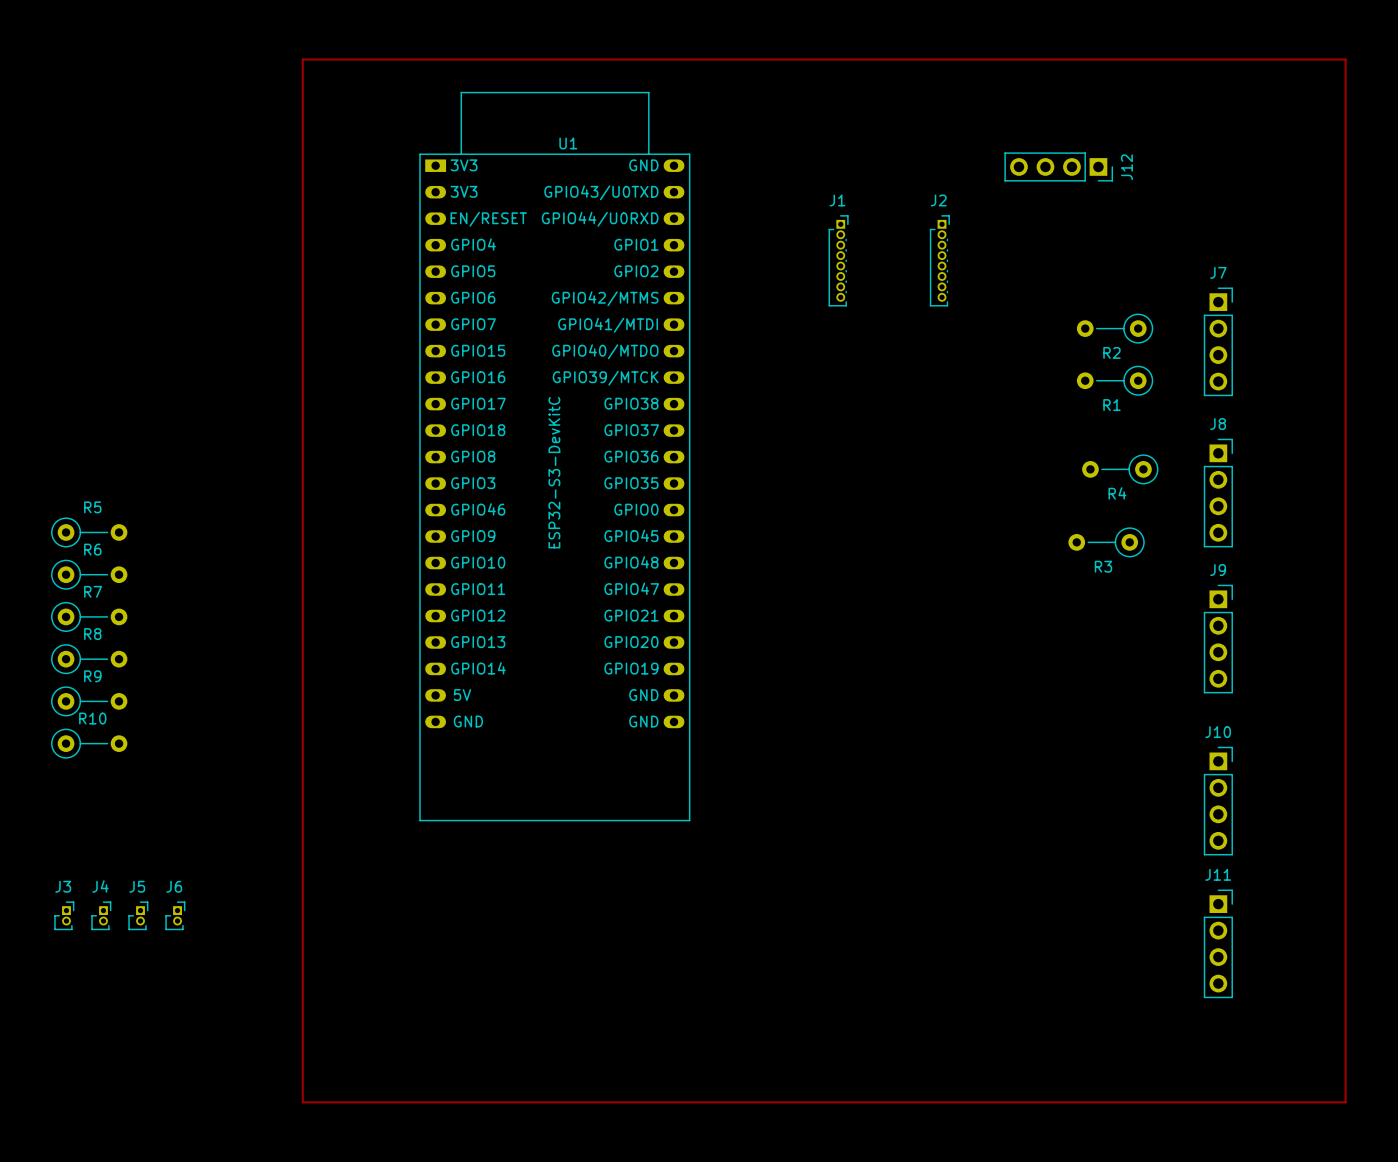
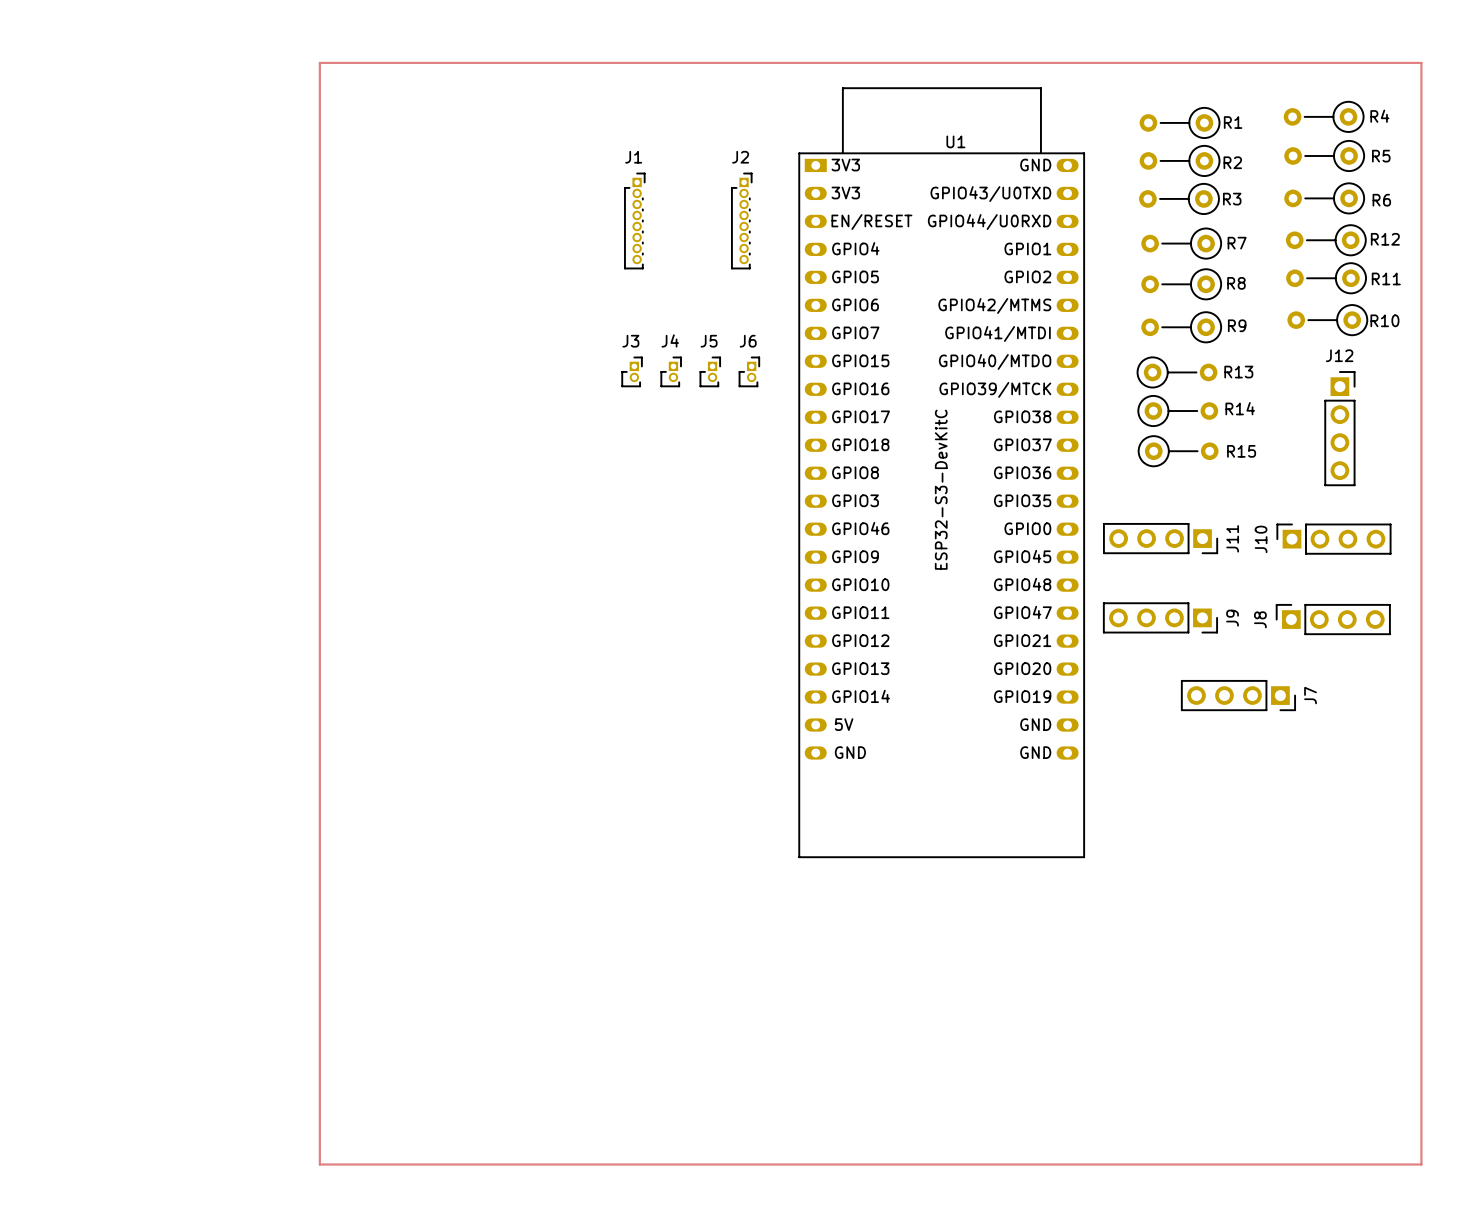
J12 rotation: 0° (1058, 166) -> 90° counterclockwise (1339, 428)
J12 position: (1058, 166) -> (1339, 428)
R12: none -> (1326, 240)
J1 position: (838, 260) -> (634, 220)
J2 position: (939, 260) -> (741, 220)
R11: none -> (1326, 278)
R2 position: (1115, 328) -> (1179, 160)
J7 rotation: 0° (1218, 341) -> 90° clockwise (1238, 695)
J7 position: (1218, 341) -> (1238, 695)
R2 name position: R2 (1111, 352) -> R2 (1232, 162)
R13: none -> (1177, 372)
R1 position: (1115, 380) -> (1179, 198)
R14: none -> (1177, 411)
R1 name position: R1 (1111, 405) -> R1 (1233, 122)
R15: none -> (1178, 451)
U1 position: (554, 456) -> (941, 472)
R4 position: (1120, 469) -> (1323, 116)
R4 name position: R4 (1117, 493) -> R4 (1379, 116)
J8 rotation: 0° (1218, 493) -> 90° counterclockwise (1333, 619)
J8 position: (1218, 493) -> (1333, 619)
R5 name position: R5 (92, 507) -> R5 (1381, 156)
R5 rotation: 0° (89, 532) -> 180° (1324, 155)
R5 position: (89, 532) -> (1324, 155)
R3 position: (1106, 542) -> (1179, 122)
R6 name position: R6 (92, 549) -> R6 (1381, 200)
R3 name position: R3 (1103, 566) -> R3 (1232, 199)
R6 rotation: 0° (89, 574) -> 180° (1324, 198)
R6 position: (89, 574) -> (1324, 198)
R7 name position: R7 (93, 591) -> R7 (1237, 243)
R7 rotation: 0° (89, 616) -> 180° (1181, 243)
R7 position: (89, 616) -> (1181, 243)
R8 name position: R8 (92, 634) -> R8 (1236, 283)
J9 rotation: 0° (1218, 639) -> 90° clockwise (1160, 617)
J9 position: (1218, 639) -> (1160, 617)
R8 rotation: 0° (89, 659) -> 180° (1181, 284)
R8 position: (89, 659) -> (1181, 284)
R9 name position: R9 (92, 676) -> R9 (1237, 325)
R9 rotation: 0° (89, 701) -> 180° (1181, 327)
R9 position: (89, 701) -> (1181, 327)
R10 name position: R10 (92, 718) -> R10 (1384, 320)
R10 rotation: 0° (89, 743) -> 180° (1327, 320)
R10 position: (89, 743) -> (1327, 320)
J10 rotation: 0° (1218, 801) -> 90° counterclockwise (1333, 539)
J10 position: (1218, 801) -> (1333, 539)
J3 position: (64, 915) -> (632, 371)
J4 position: (101, 915) -> (671, 371)
J5 position: (138, 915) -> (710, 371)
J6 position: (175, 915) -> (749, 371)
J11 rotation: 0° (1218, 943) -> 90° clockwise (1160, 538)
J11 position: (1218, 943) -> (1160, 538)

